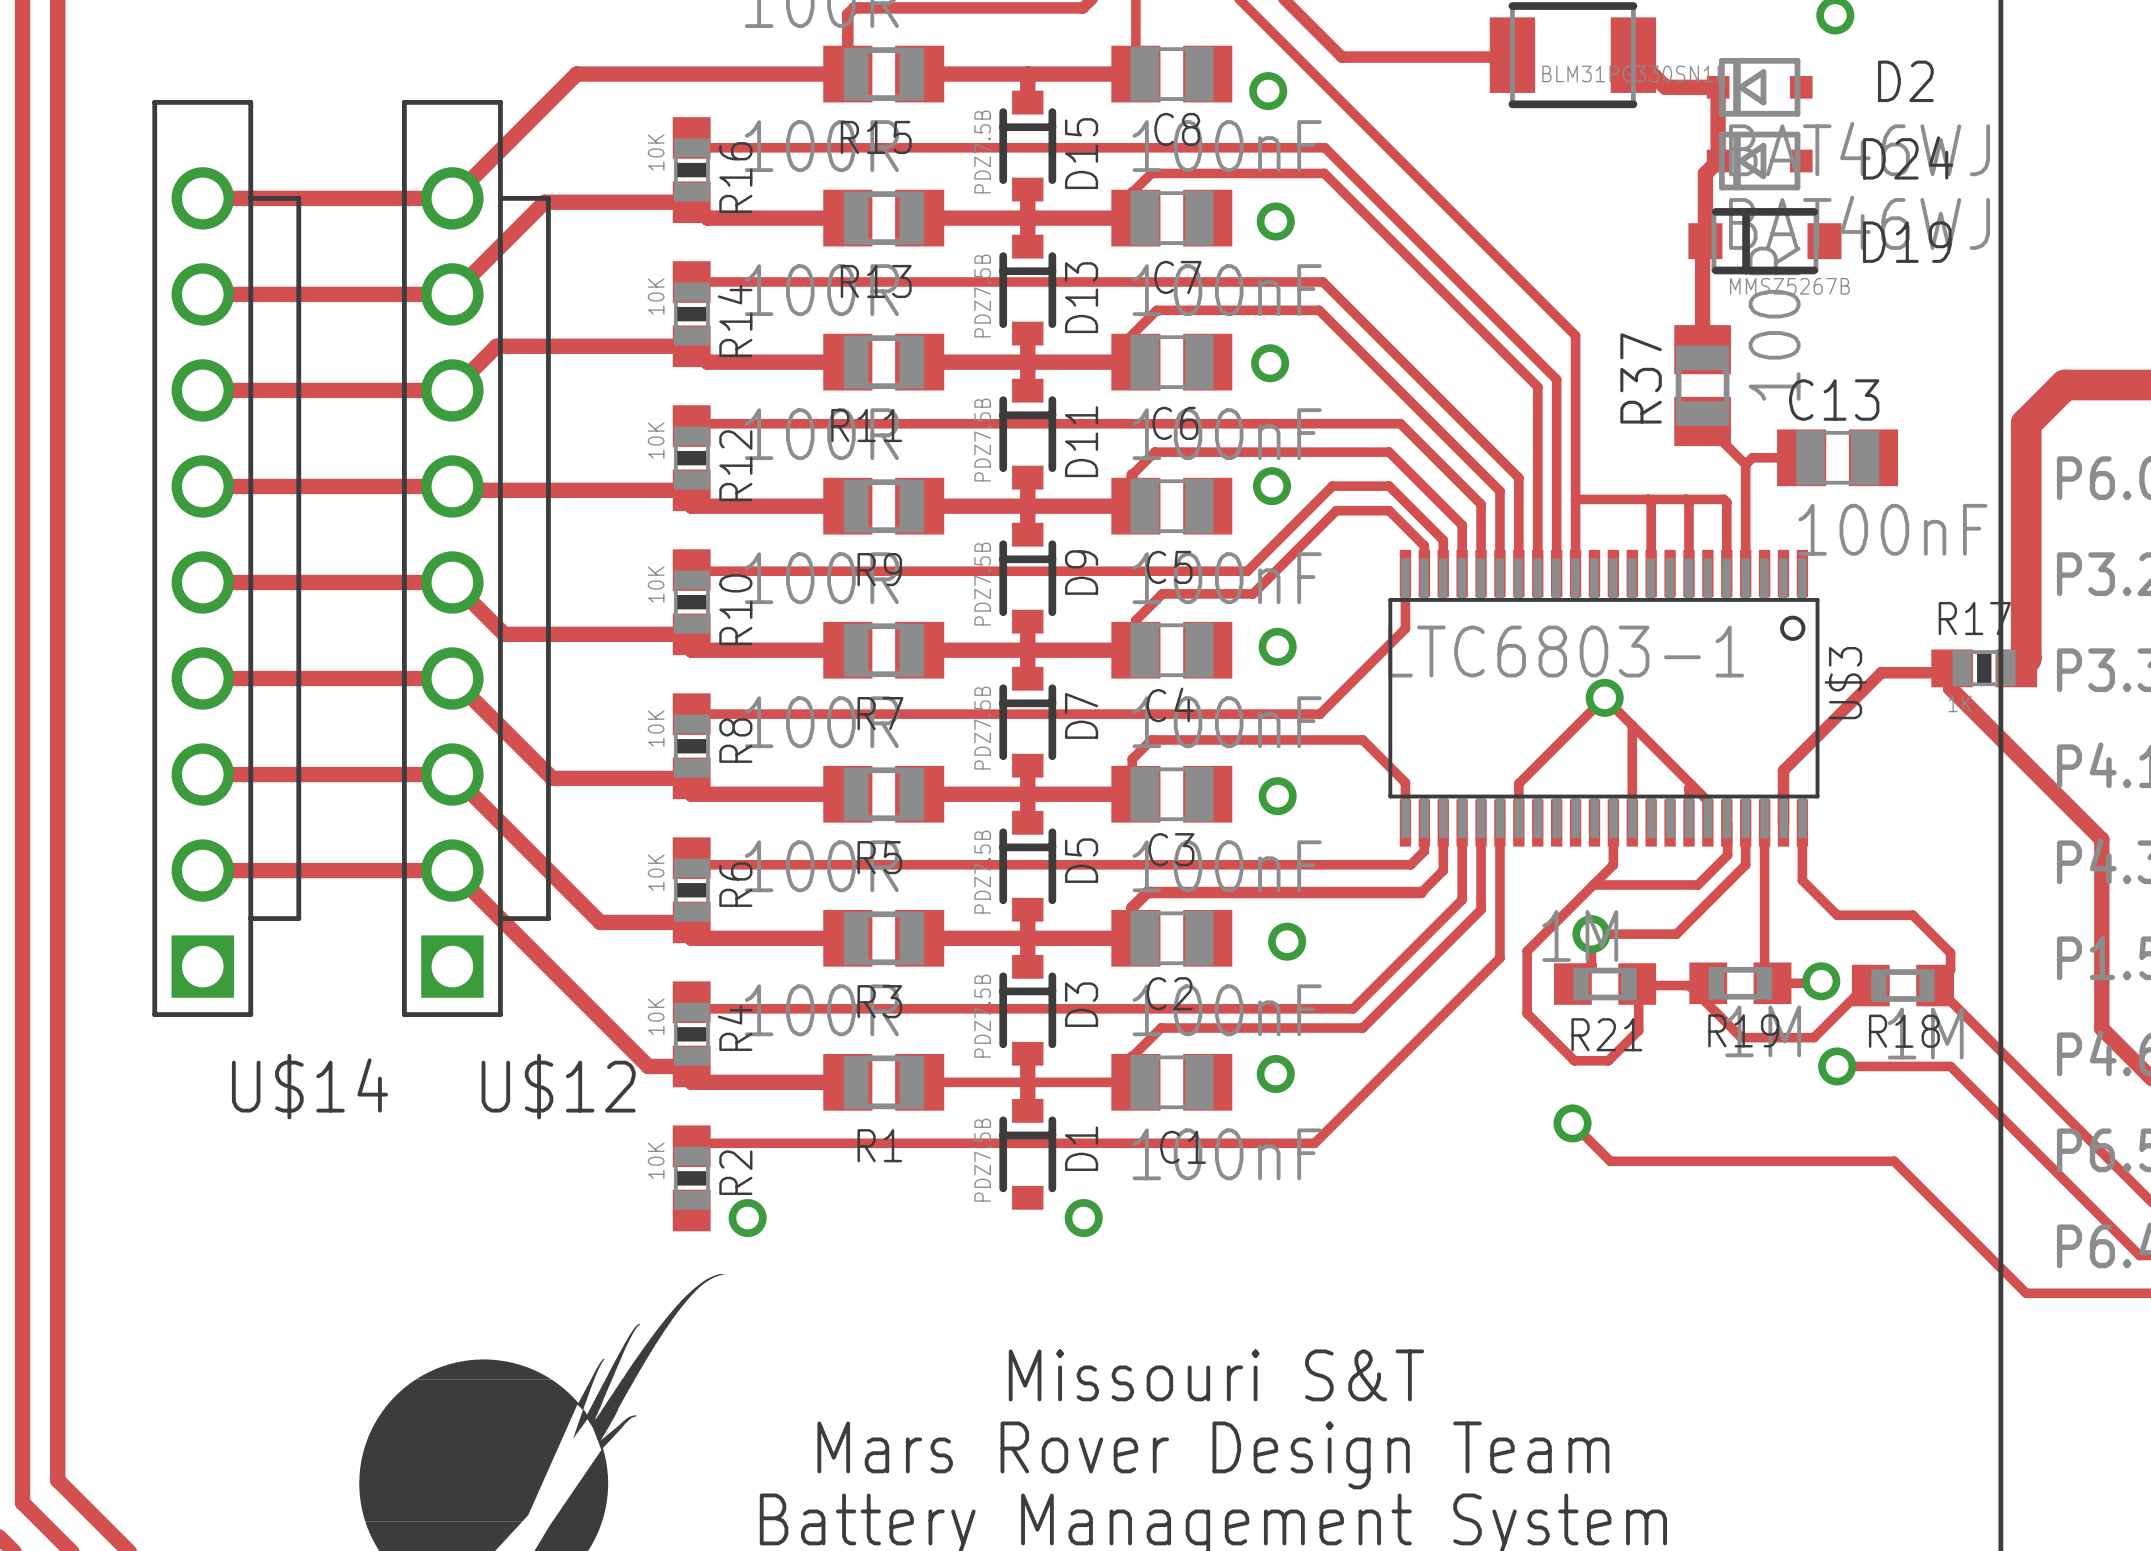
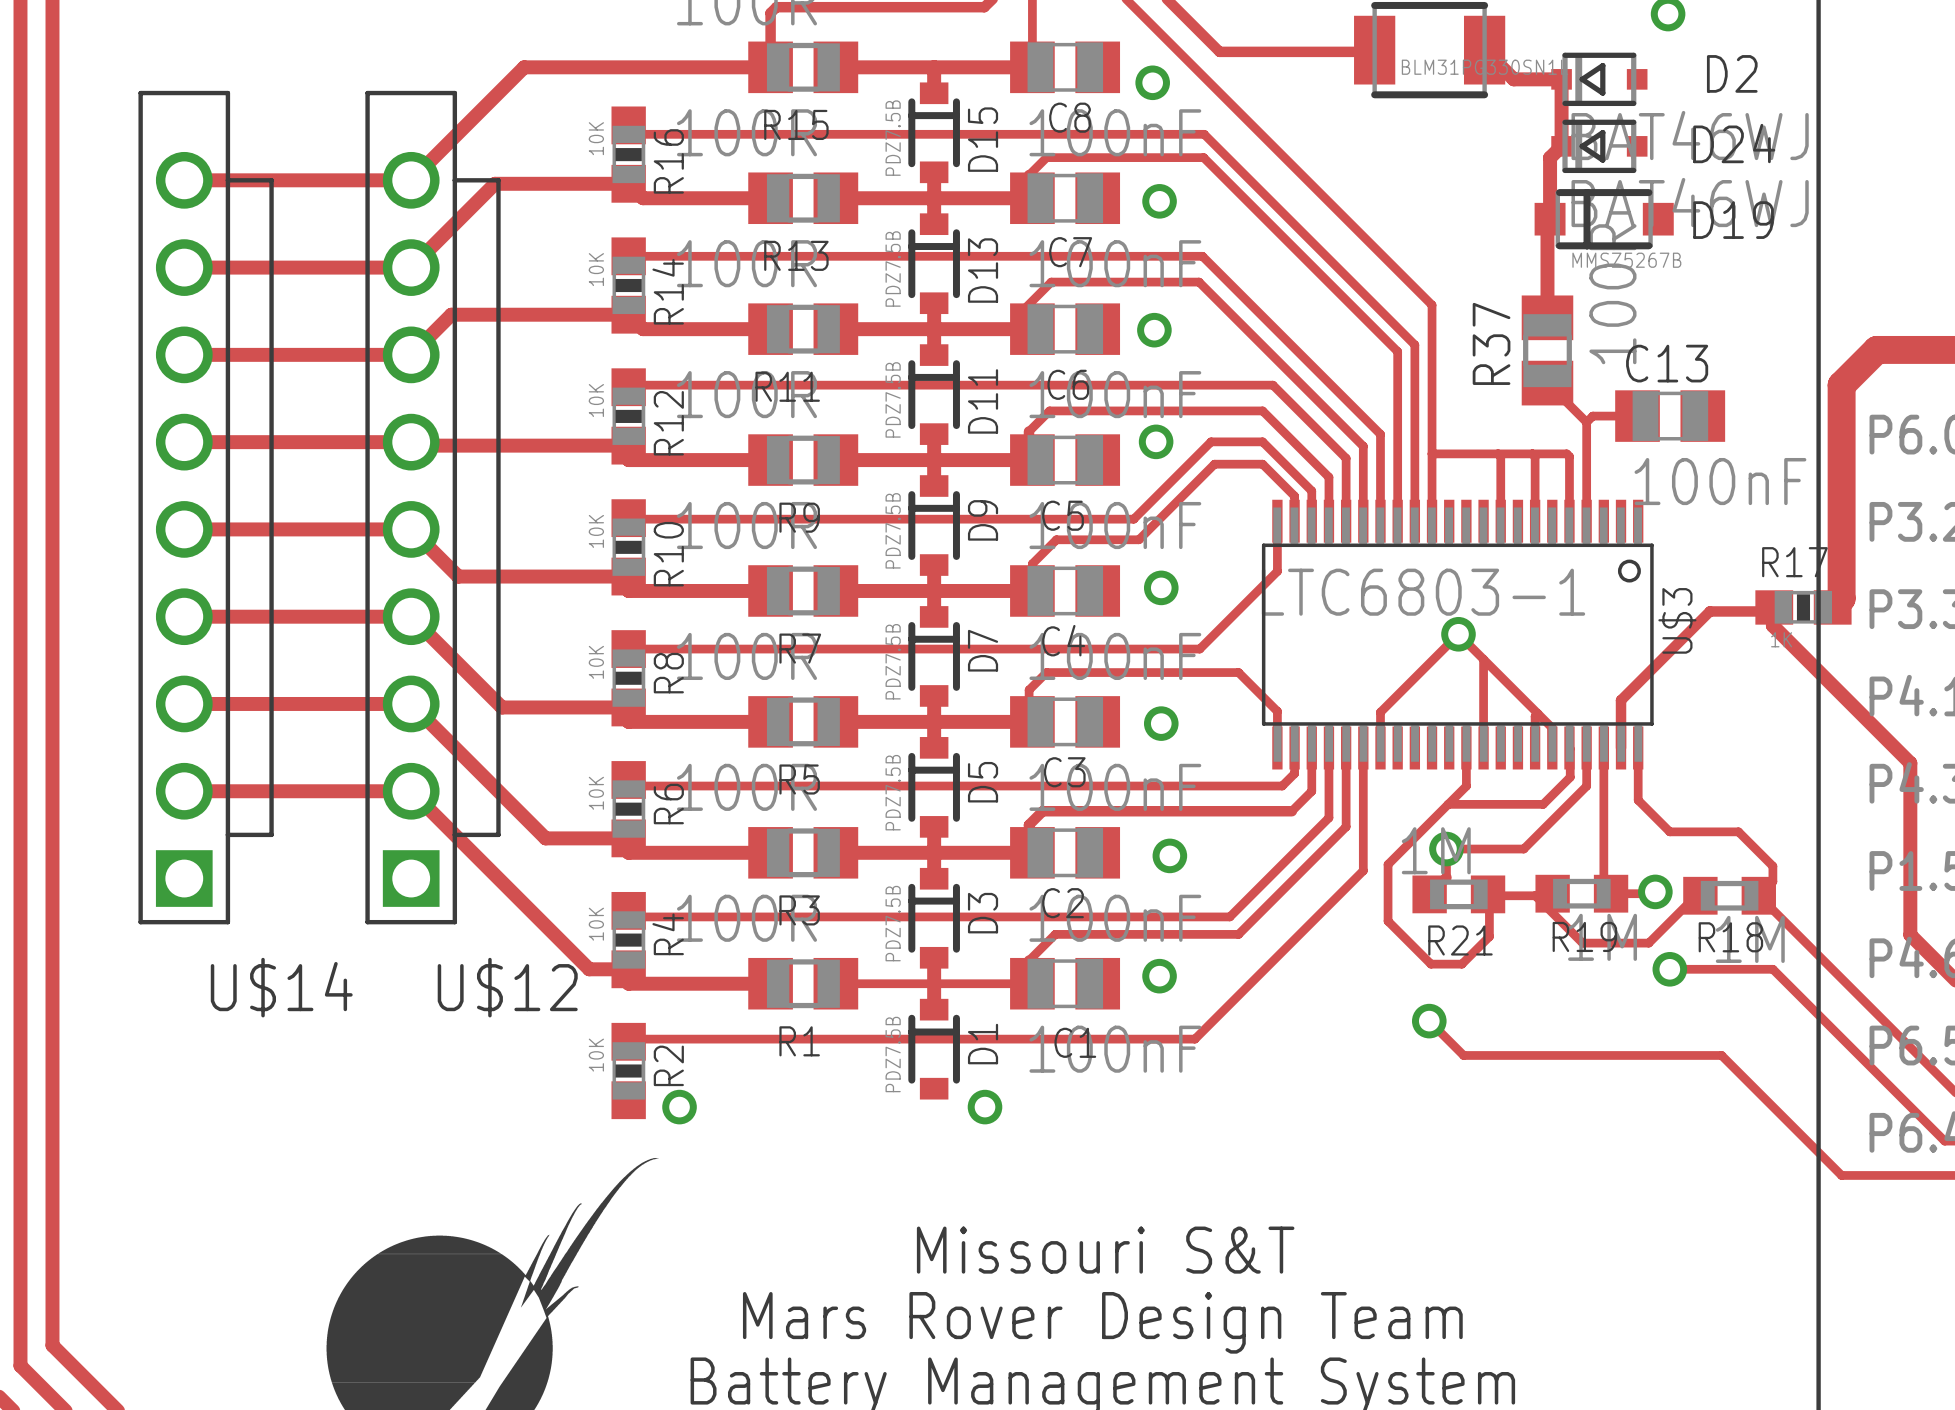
D2 footprint: [1706, 57, 1813, 117] -> [1551, 52, 1648, 107]
D24 footprint: [1706, 131, 1813, 191] -> [1551, 119, 1648, 174]

